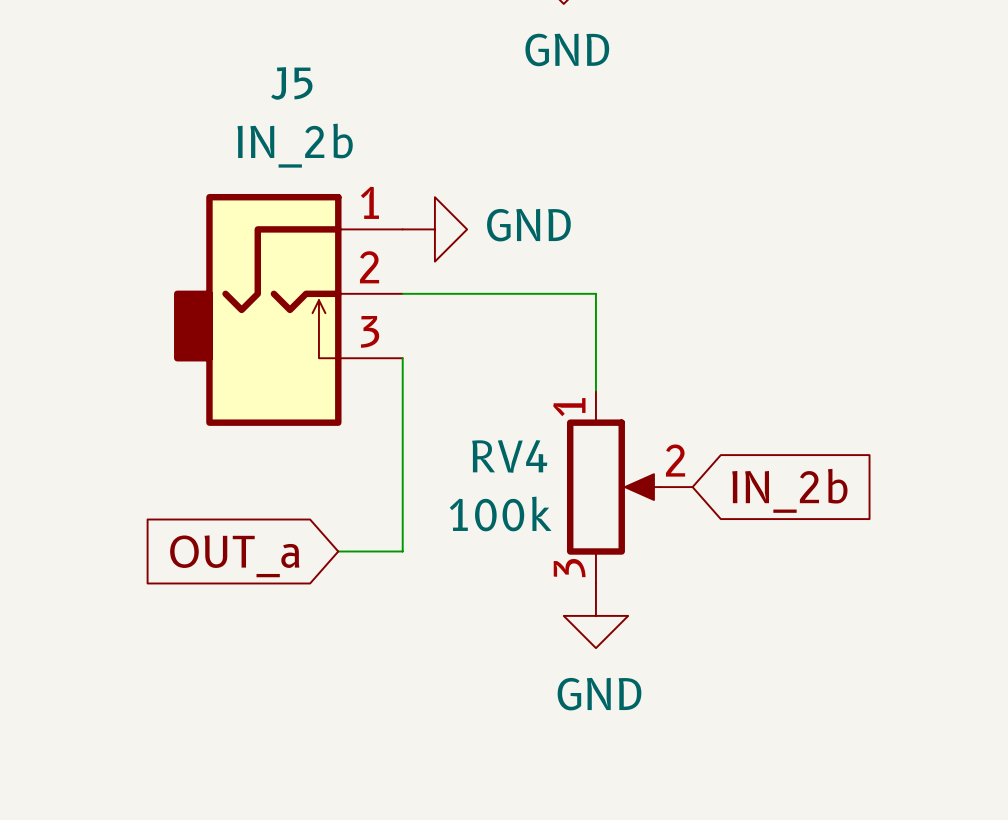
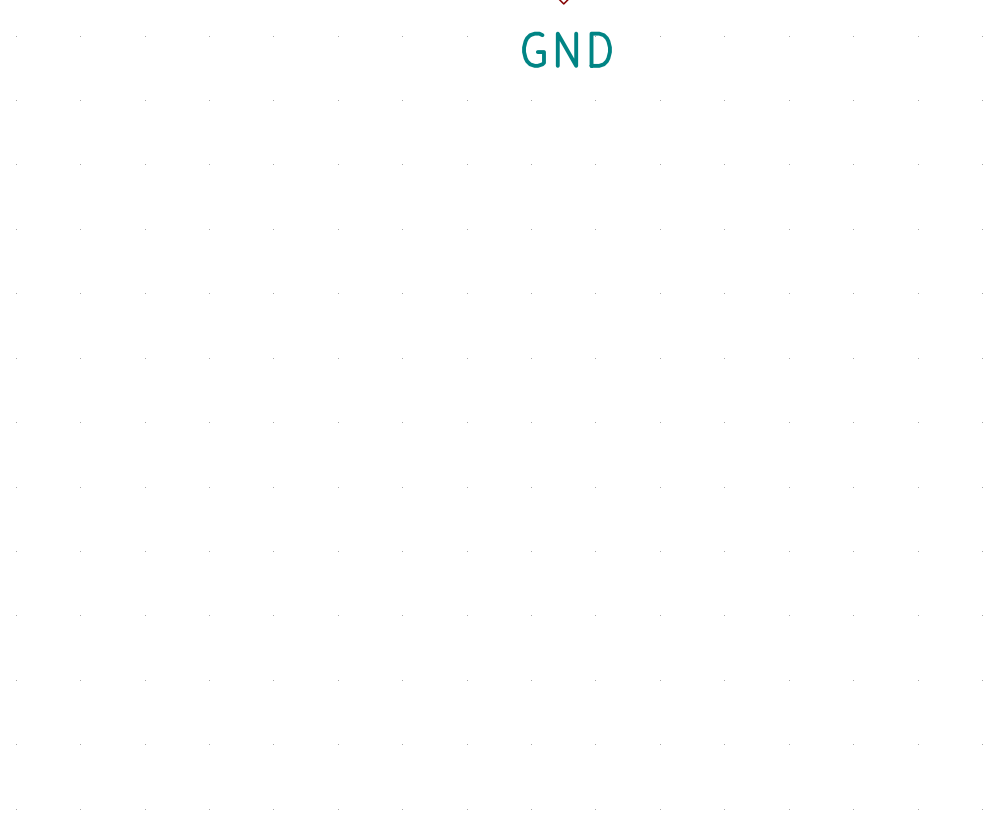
power symbol: GND (434, 229) -> none
wire: (402, 293) (595, 293) (595, 390) -> none
J5: IN_2b (288, 309) -> none
wire: (402, 358) (402, 551) (338, 551) -> none
RV4: 100k (629, 487) -> none
global label: IN_2b (789, 490) -> none
global label: OUT_a (234, 556) -> none
power symbol: GND (595, 615) -> none

